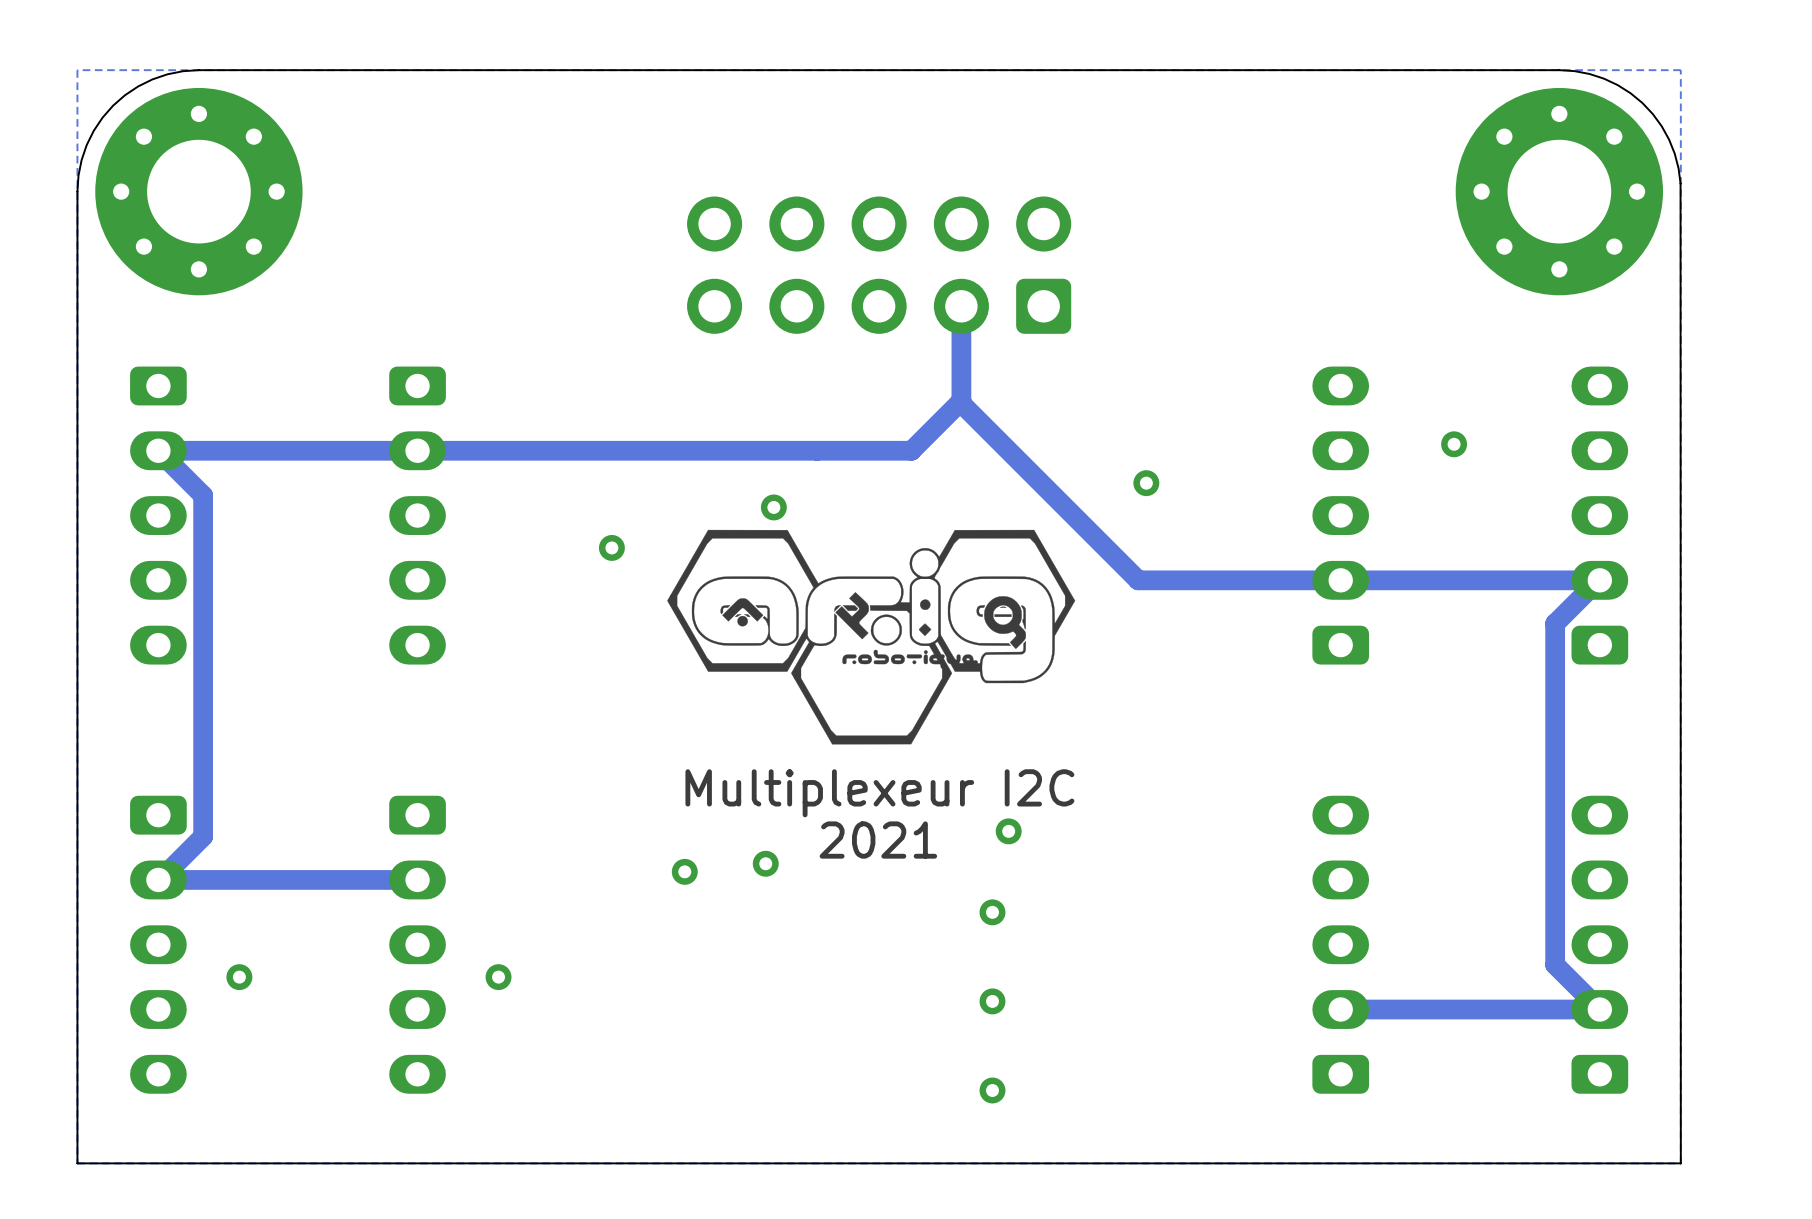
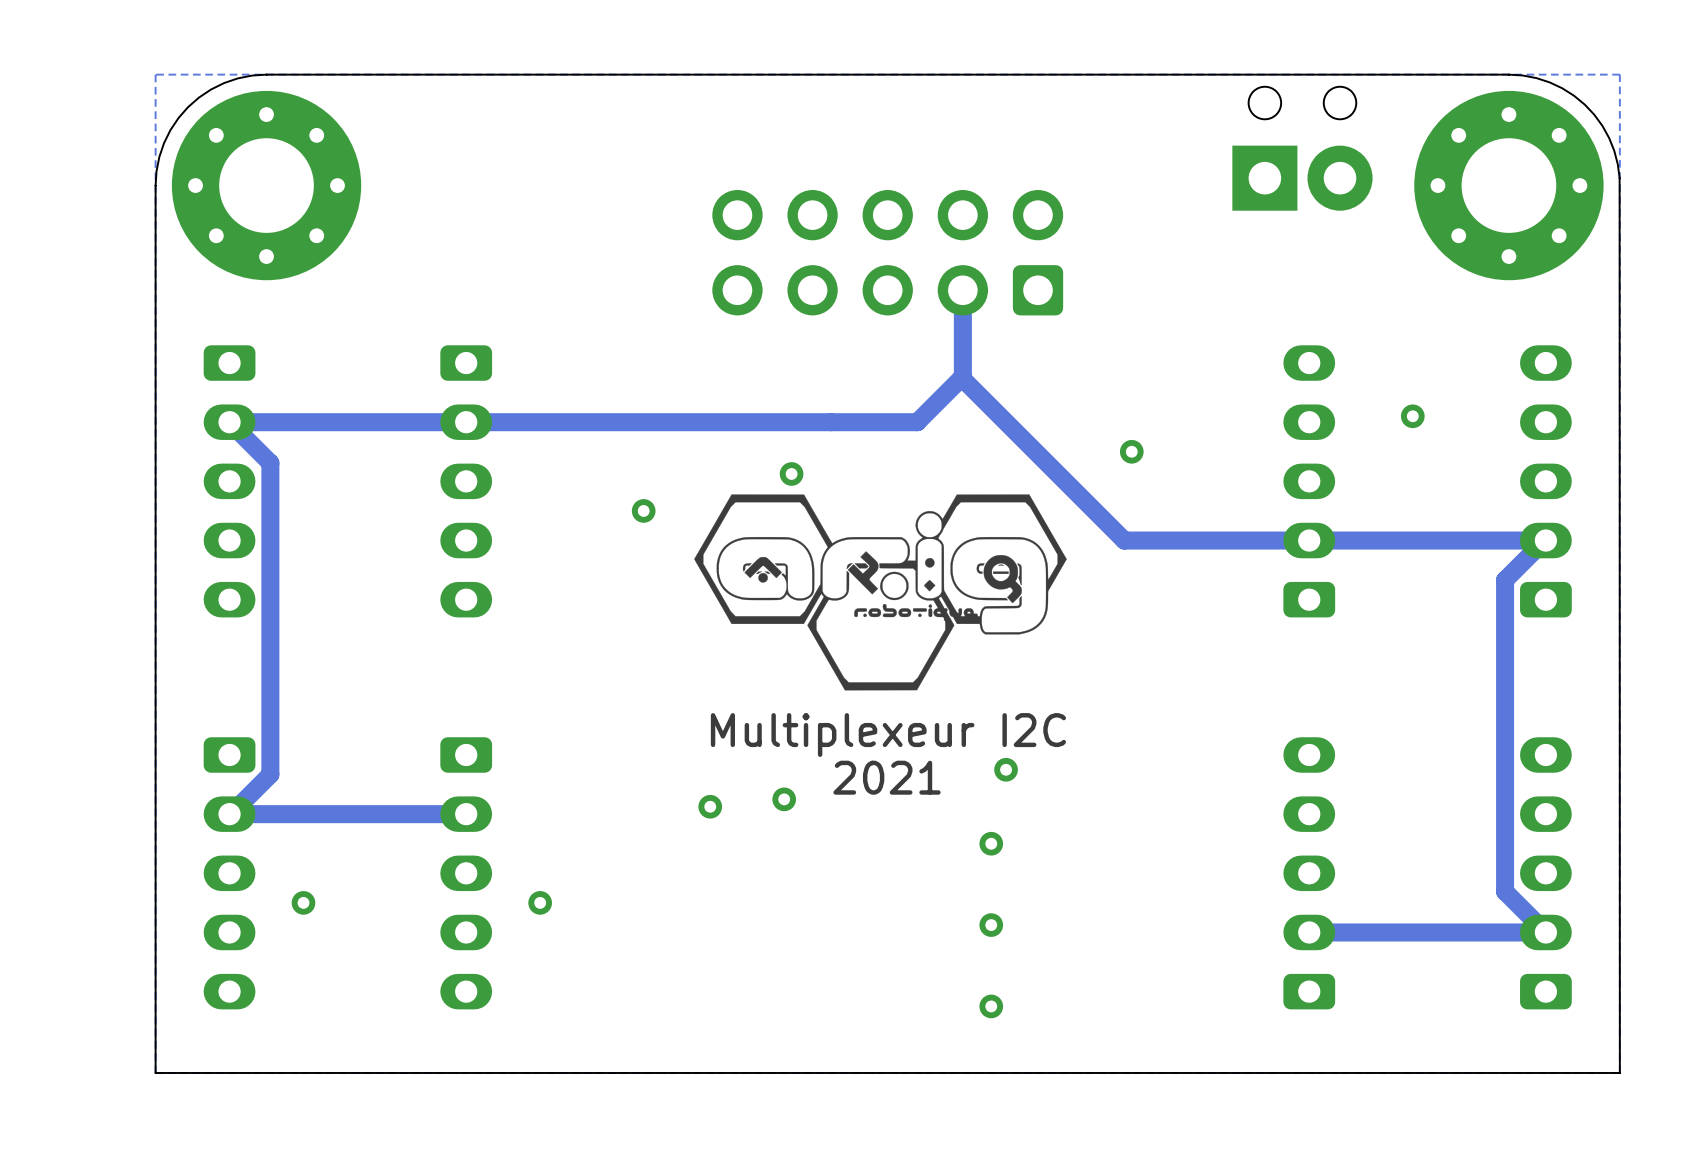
part: none -> (1302, 148)

